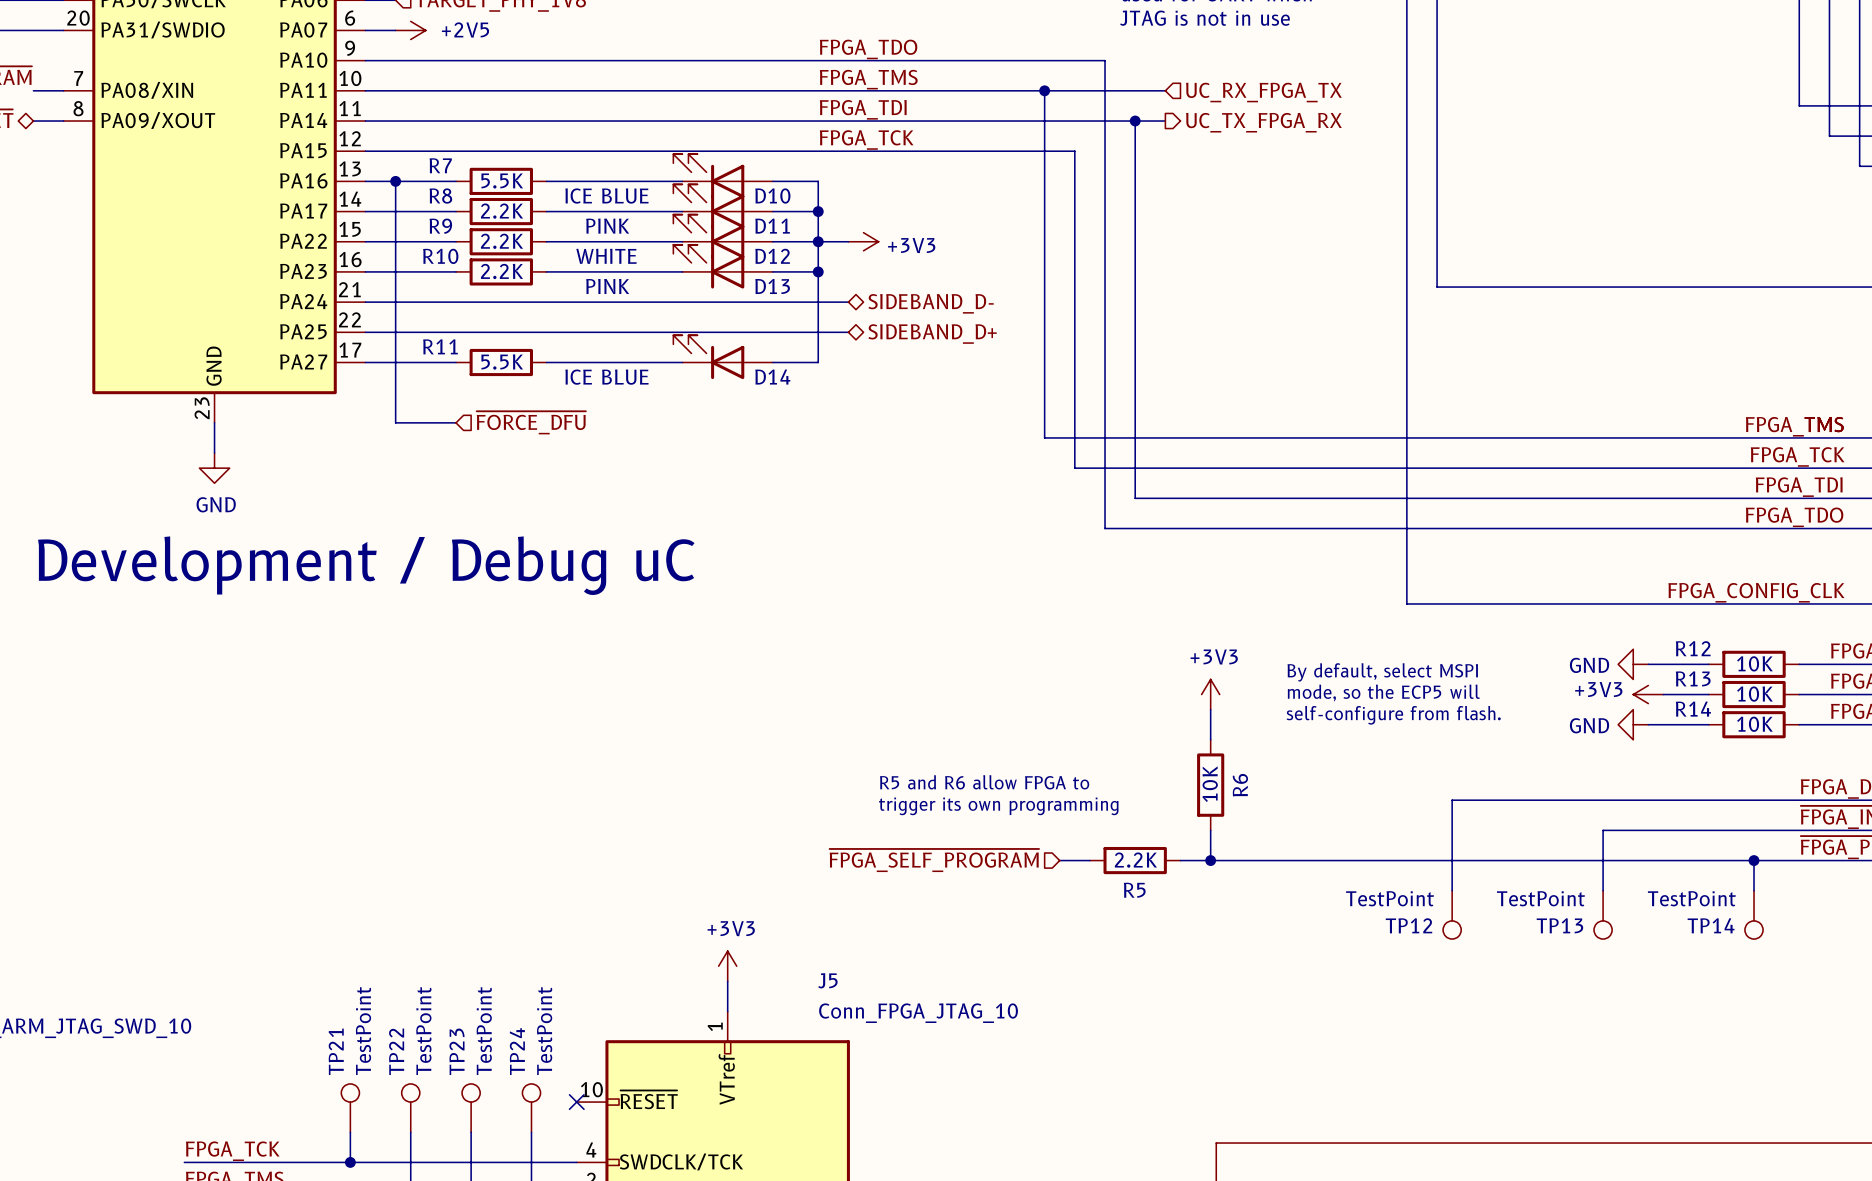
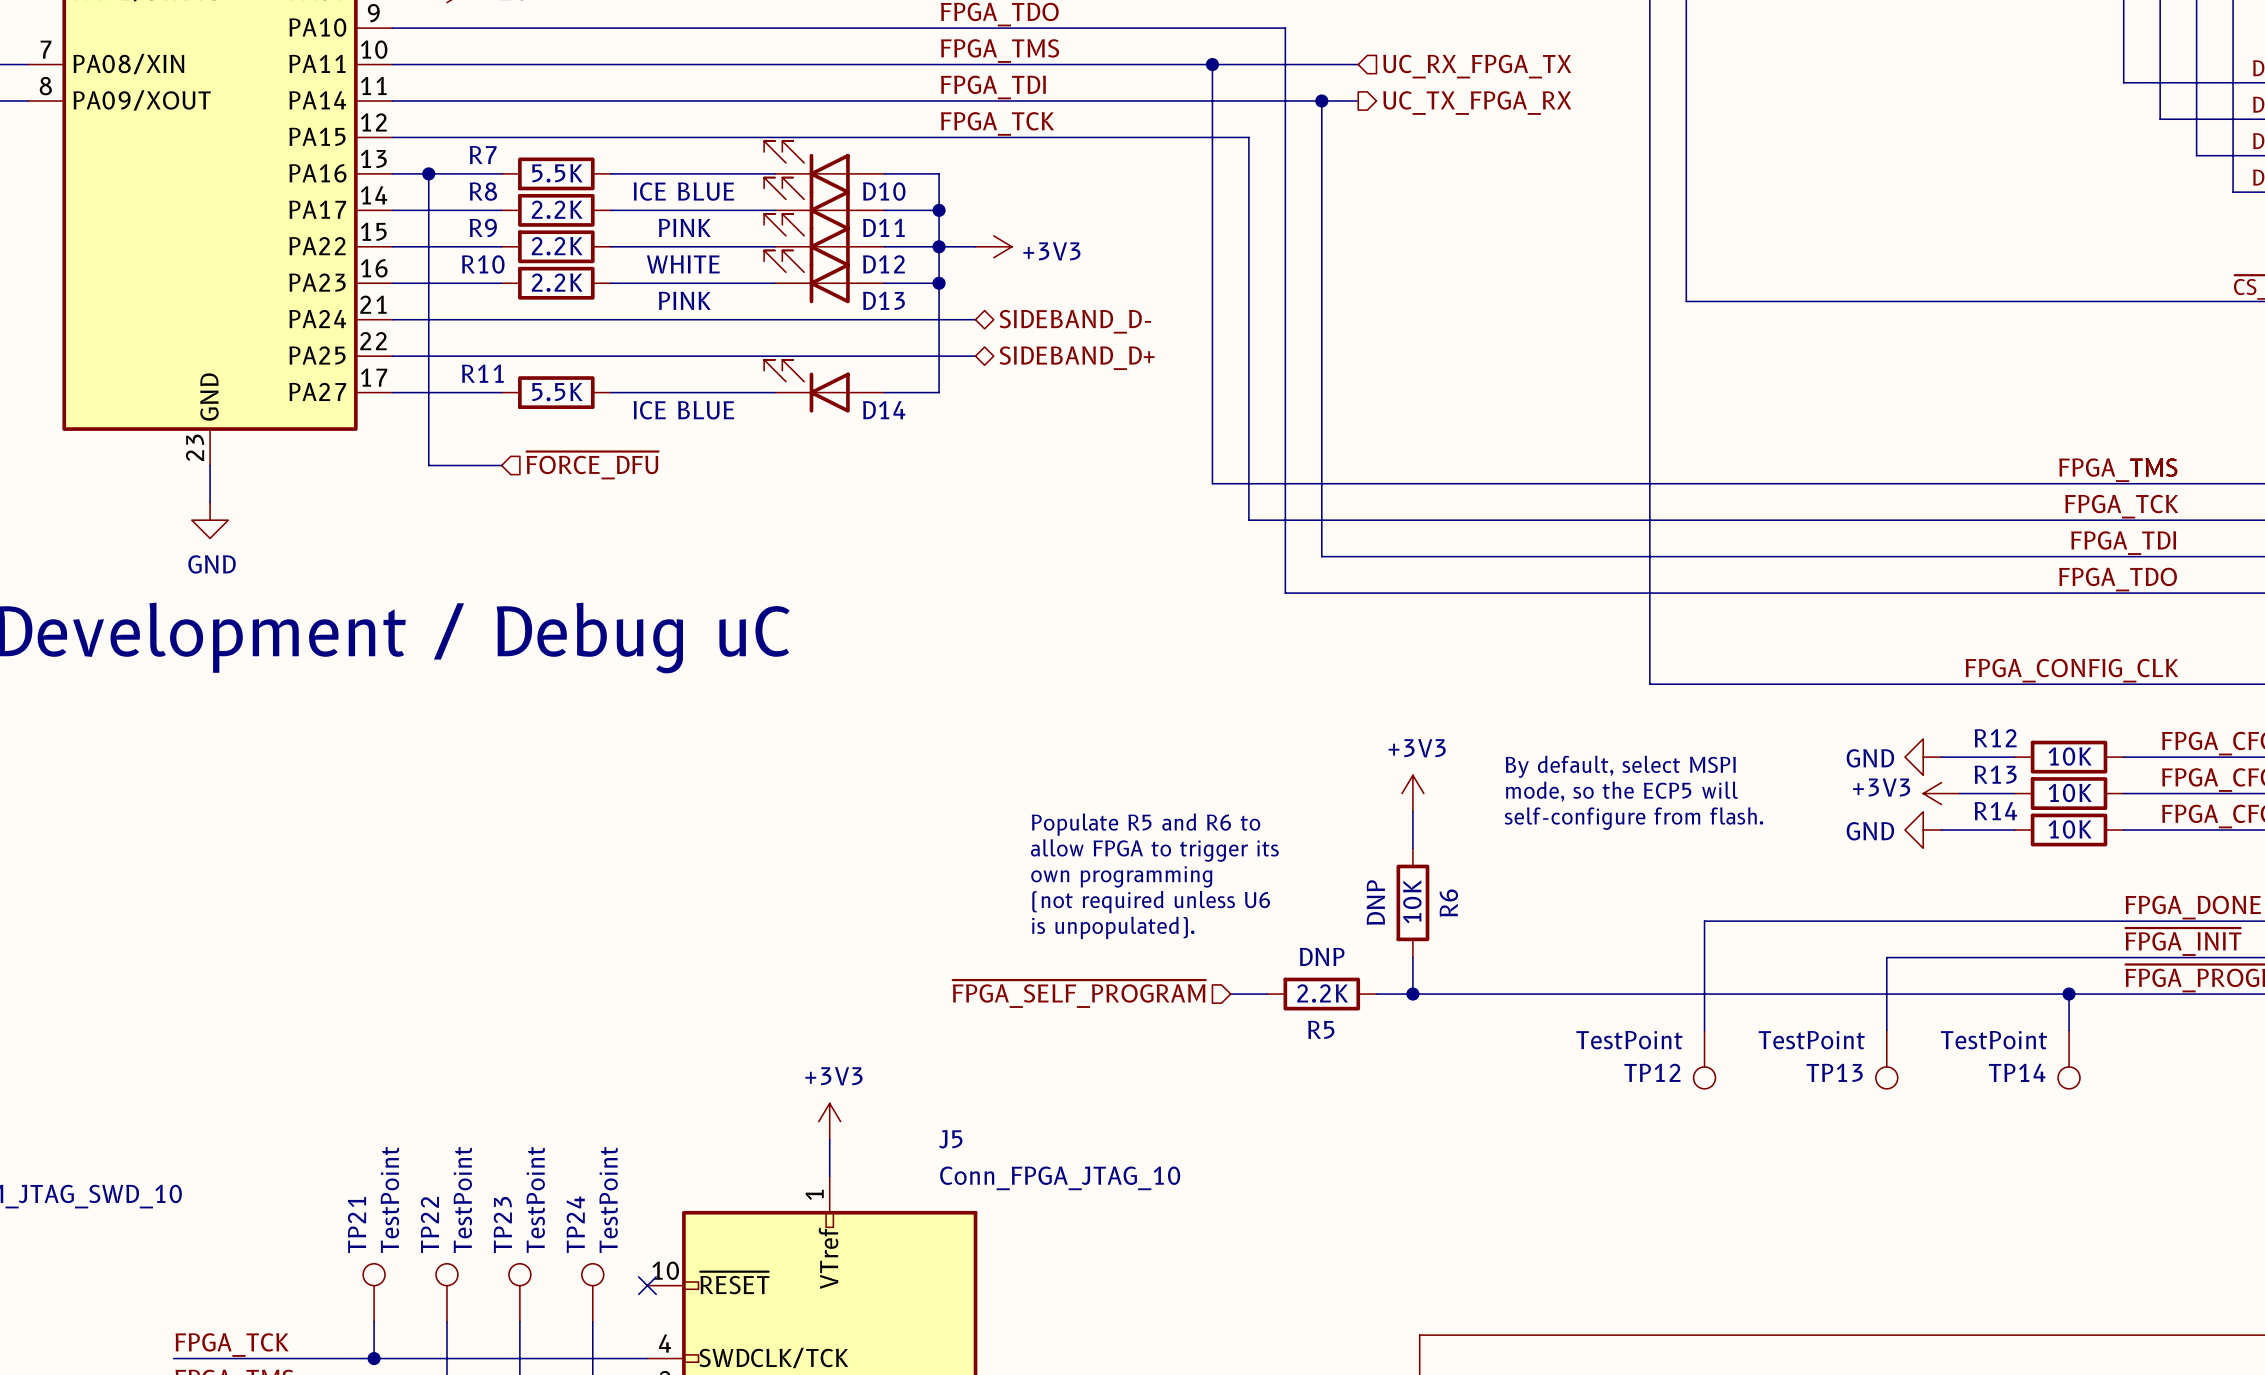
text: none -> Populate R5 and R6 to (1146, 824)
text: none -> allow FPGA to trigger its (1154, 850)
text: none -> own programming (1121, 876)
text: R5 and R6 allow FPGA to (984, 782) -> none
text: none -> (not required unless U6 (1151, 902)
R6 text: none -> DNP (1375, 902)
text: none -> is unpopulated). (1113, 927)
text: trigger its own programming (998, 806) -> none
R5 text: none -> DNP (1322, 956)

